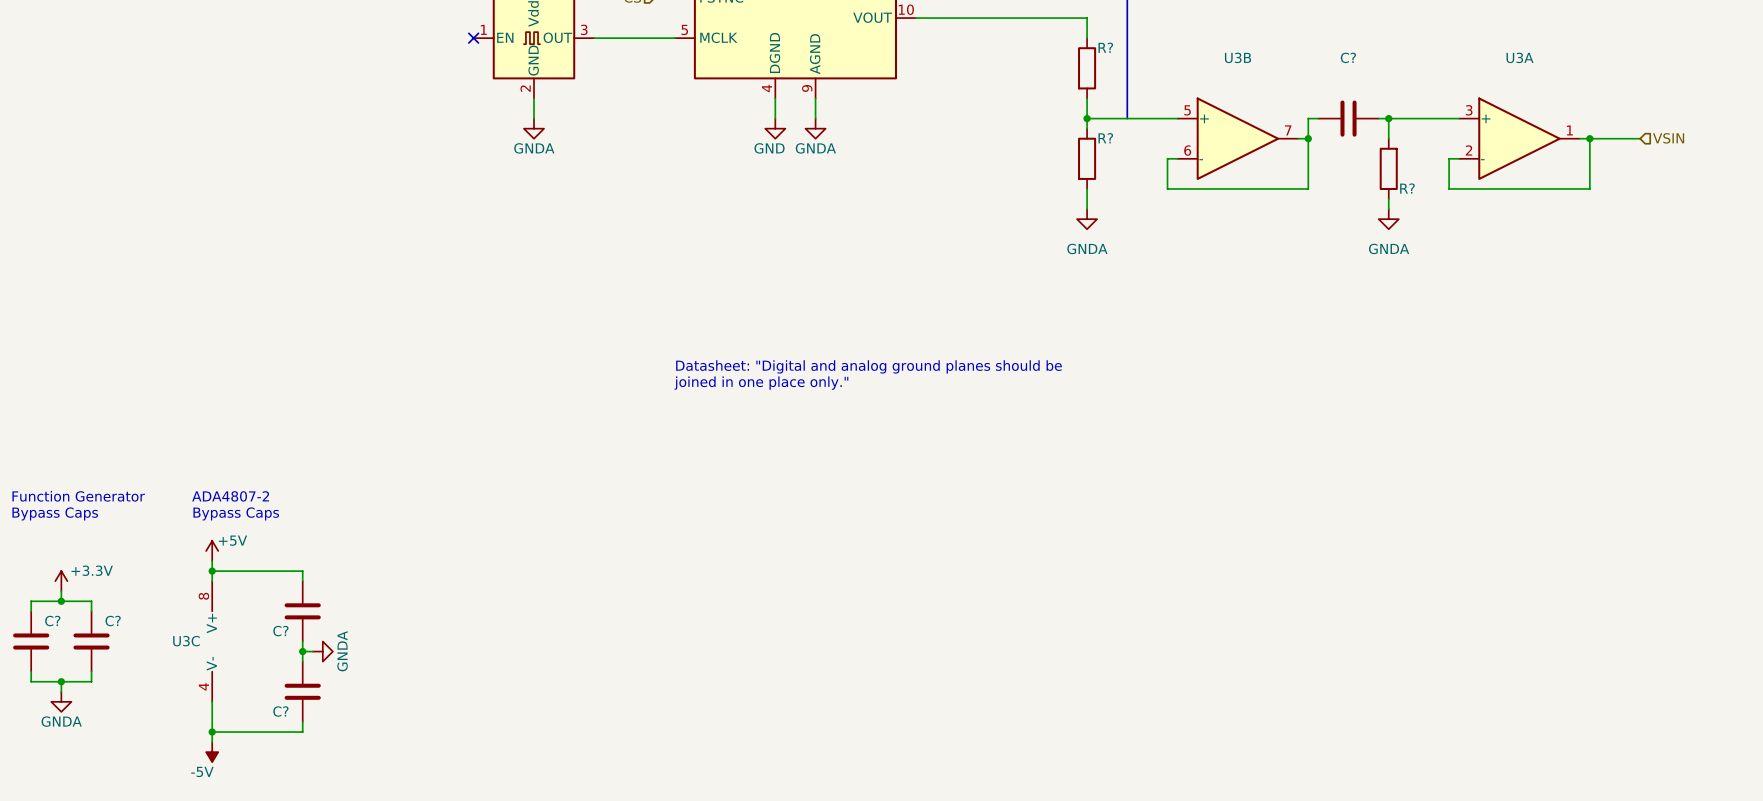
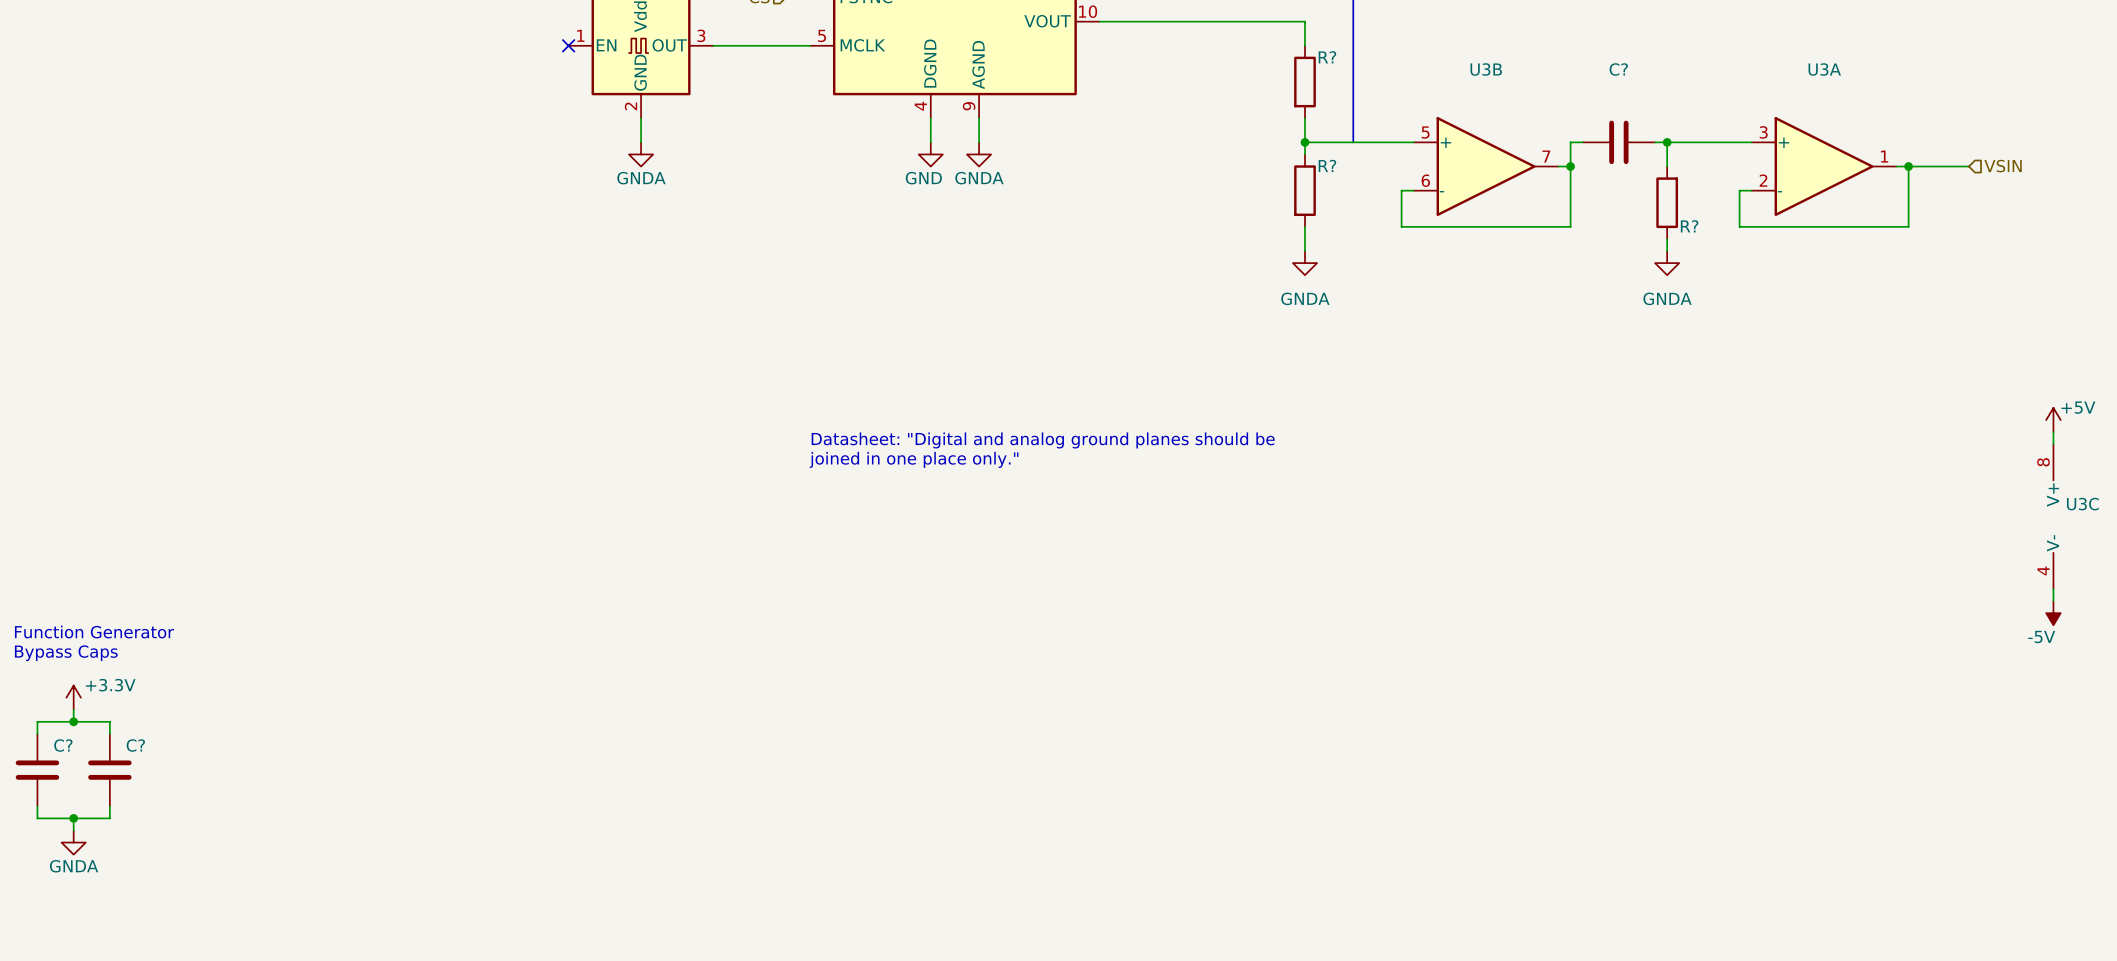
power symbol: none -> +5V (2053, 420)
wire: none -> (2053, 432) (2053, 444)
wire: none -> (2053, 589) (2053, 601)
text position: Function Generator (78, 496) -> Function Generator (94, 632)
text: ADA4807-2 (230, 496) -> none
power symbol: none -> -5V (2053, 613)
text position: Bypass Caps (55, 513) -> Bypass Caps (66, 653)
text: Bypass Caps (236, 513) -> none
power symbol: +5V (212, 551) -> none
wire: (212, 561) (212, 581) -> none
wire: (212, 571) (302, 571) (302, 581) -> none
junction: (212, 571) -> none
C?: (302, 611) -> none
U3C name position: U3C (186, 641) -> U3C (2082, 504)
U3C position: (212, 641) -> (2053, 516)
wire: (302, 641) (302, 661) -> none
wire: (302, 651) (312, 651) -> none
junction: (302, 651) -> none
power symbol: GNDA (322, 651) -> none
C?: (302, 691) -> none
wire: (212, 701) (212, 742) -> none
wire: (302, 721) (302, 732) (212, 732) -> none
junction: (212, 732) -> none
power symbol: -5V (212, 752) -> none

